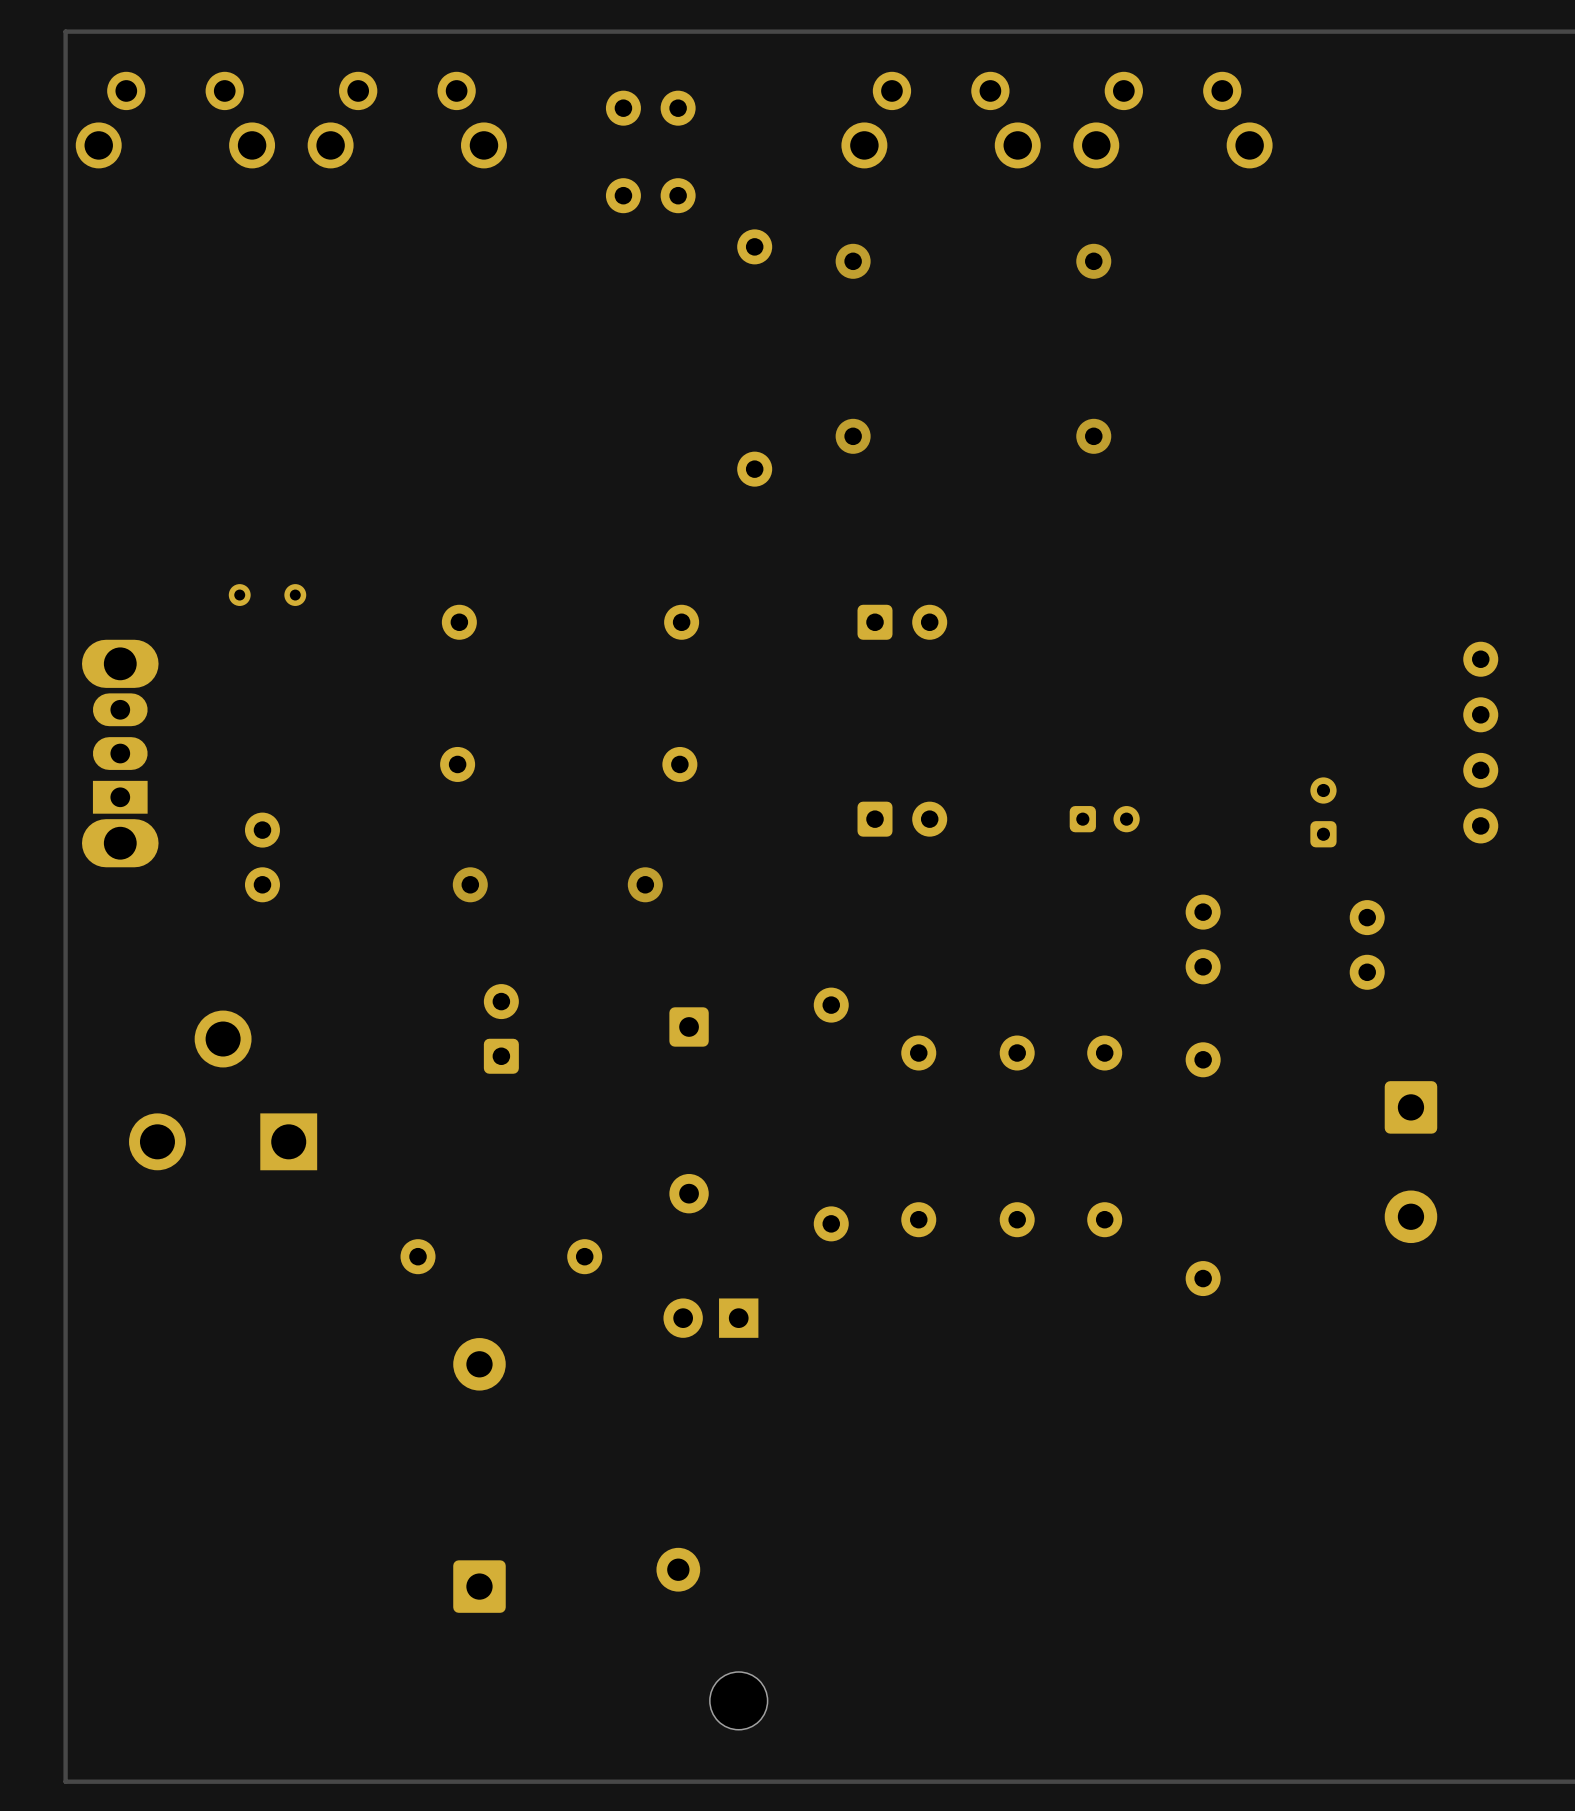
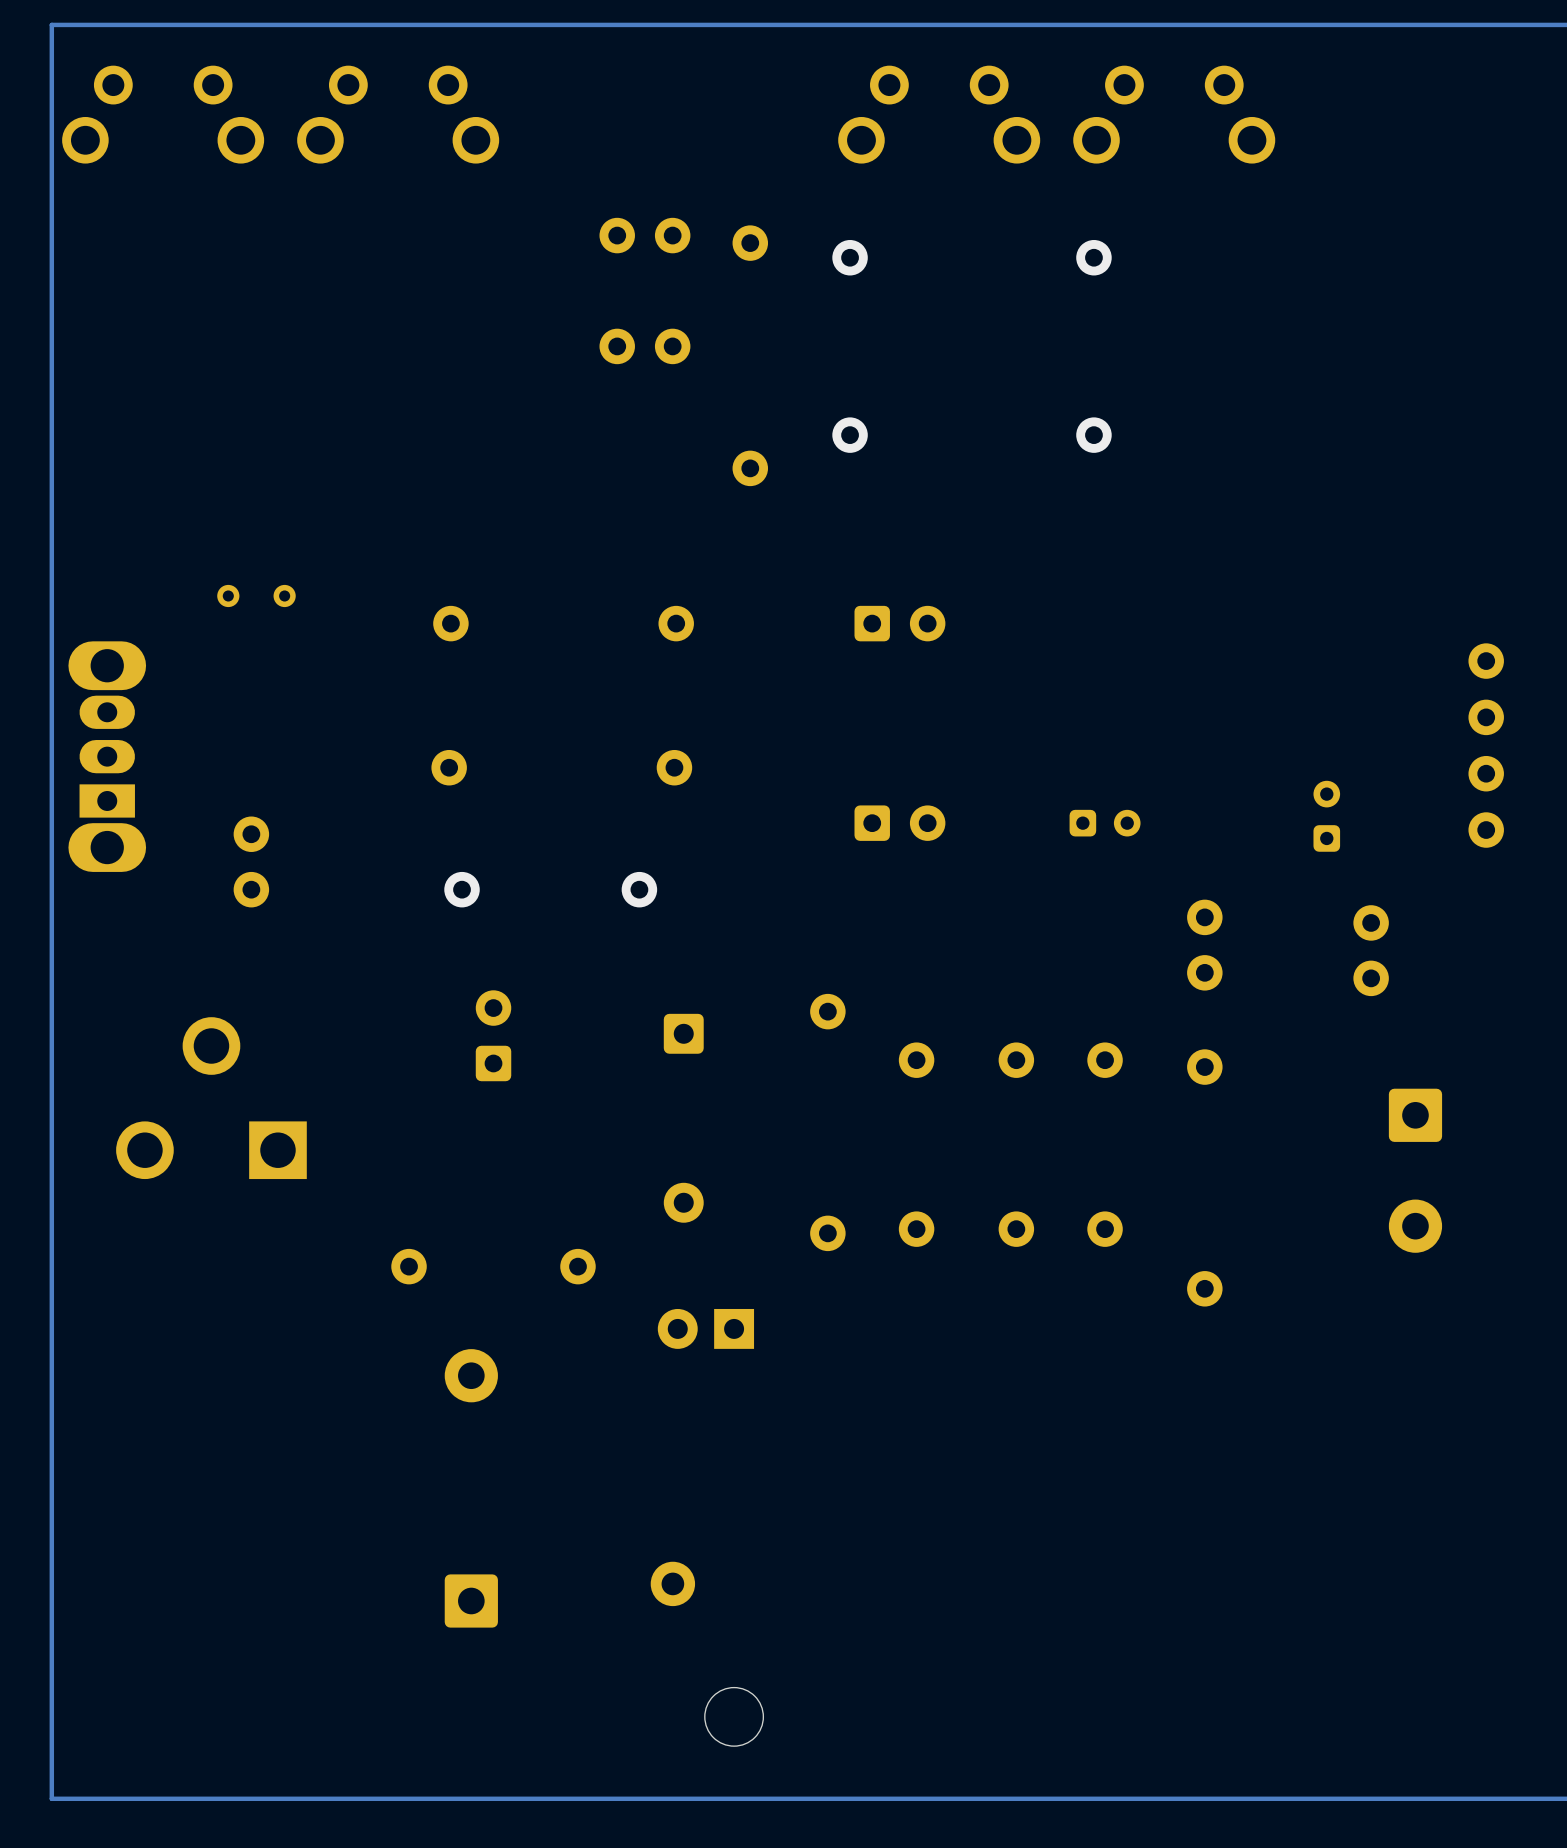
part: (650, 108) -> none
part position: (650, 195) -> (644, 235)
part: none -> (644, 346)

